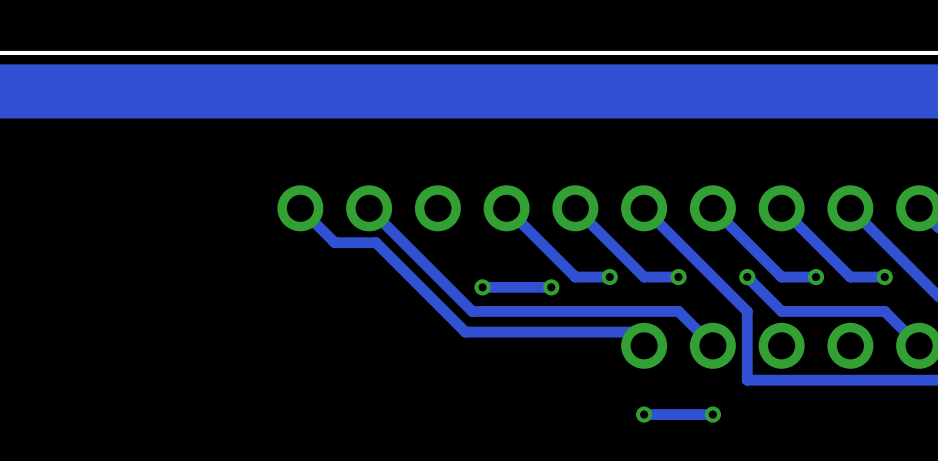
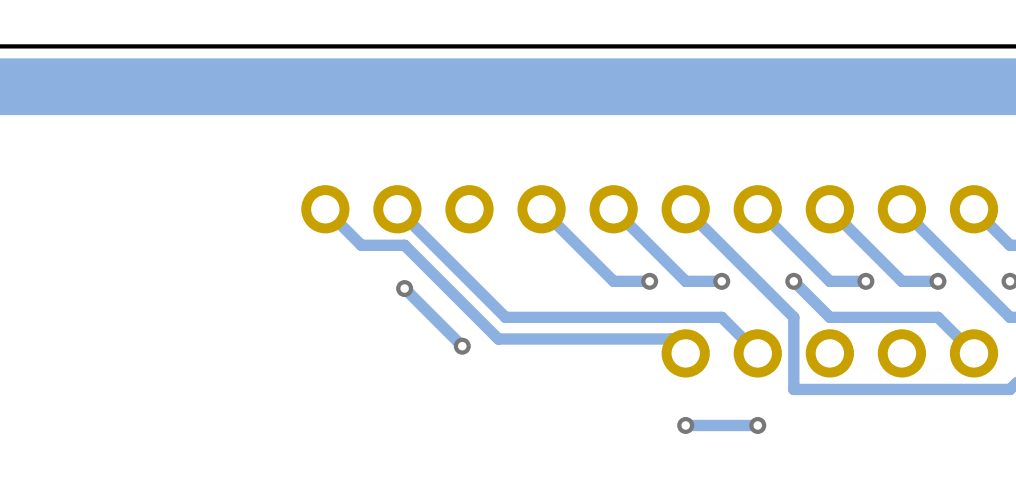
track: none -> (404, 288) (462, 346)
via: none -> (404, 288)
via: (482, 287) -> none
track: (551, 287) (482, 287) -> none
via: (551, 287) -> none
via: none -> (462, 346)

